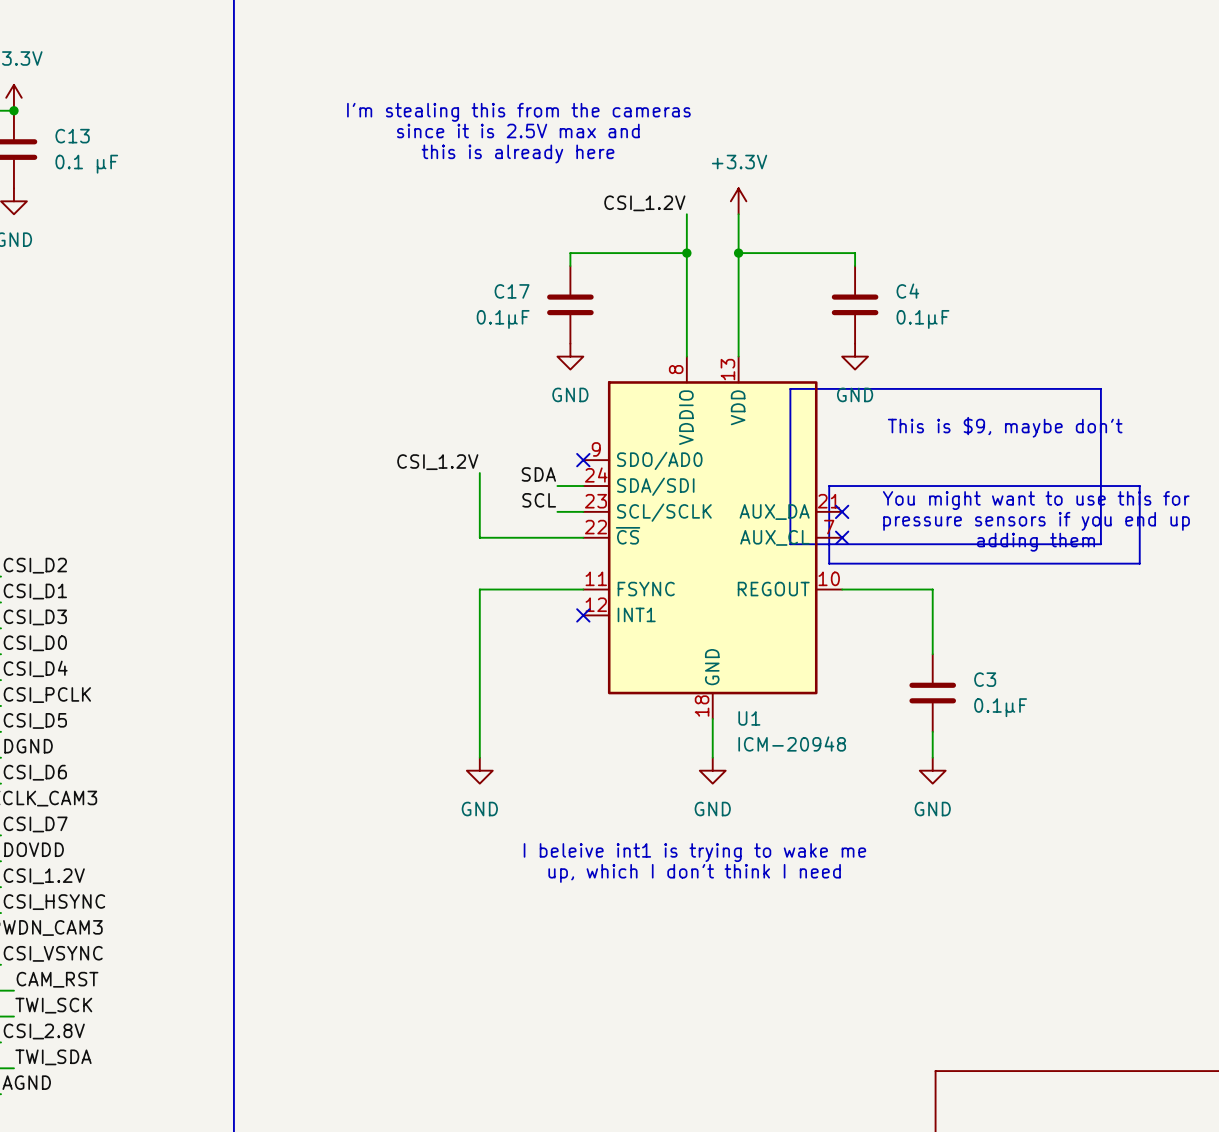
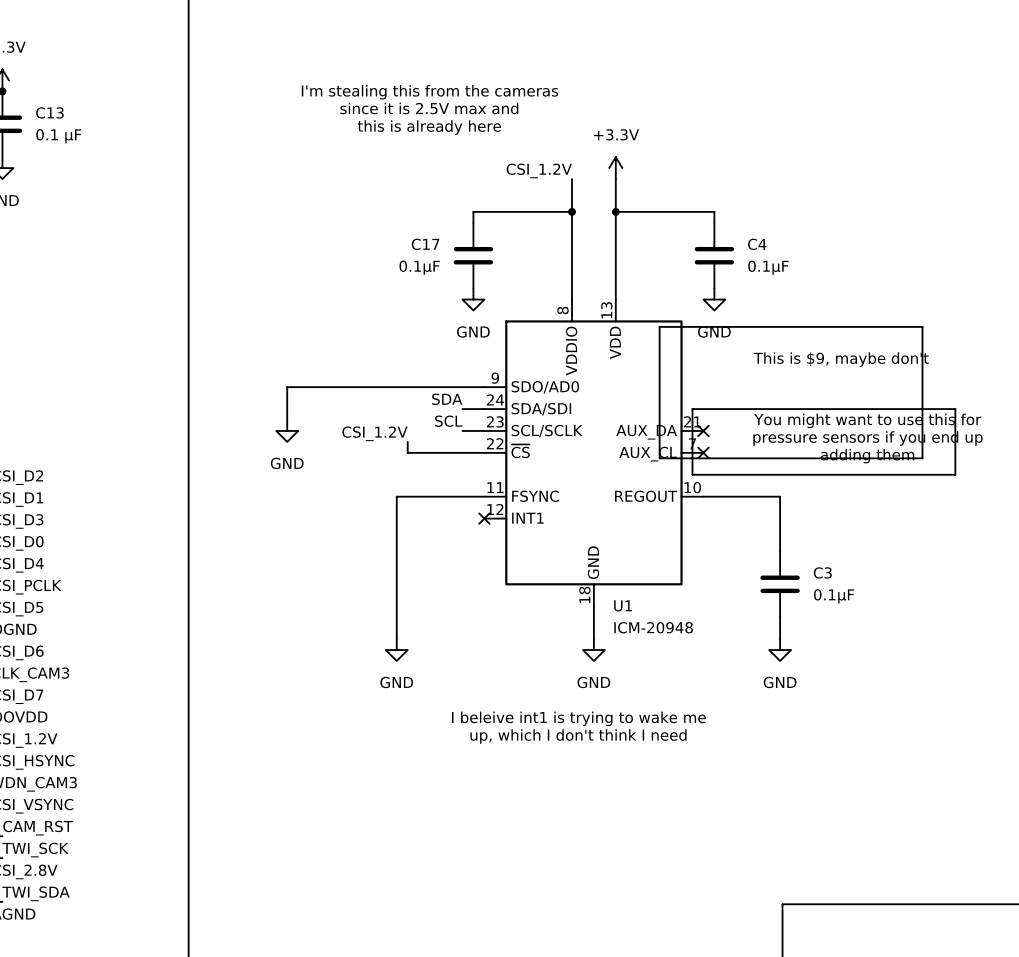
wire: none -> (484, 387) (287, 387) (287, 420)
no-connect mark: (583, 460) -> none
label position: CSI_1.2V (437, 462) -> CSI_1.2V (375, 433)
wire: (479, 473) (479, 537) (492, 537) -> (407, 441) (407, 452)
power symbol: none -> GND (287, 430)

